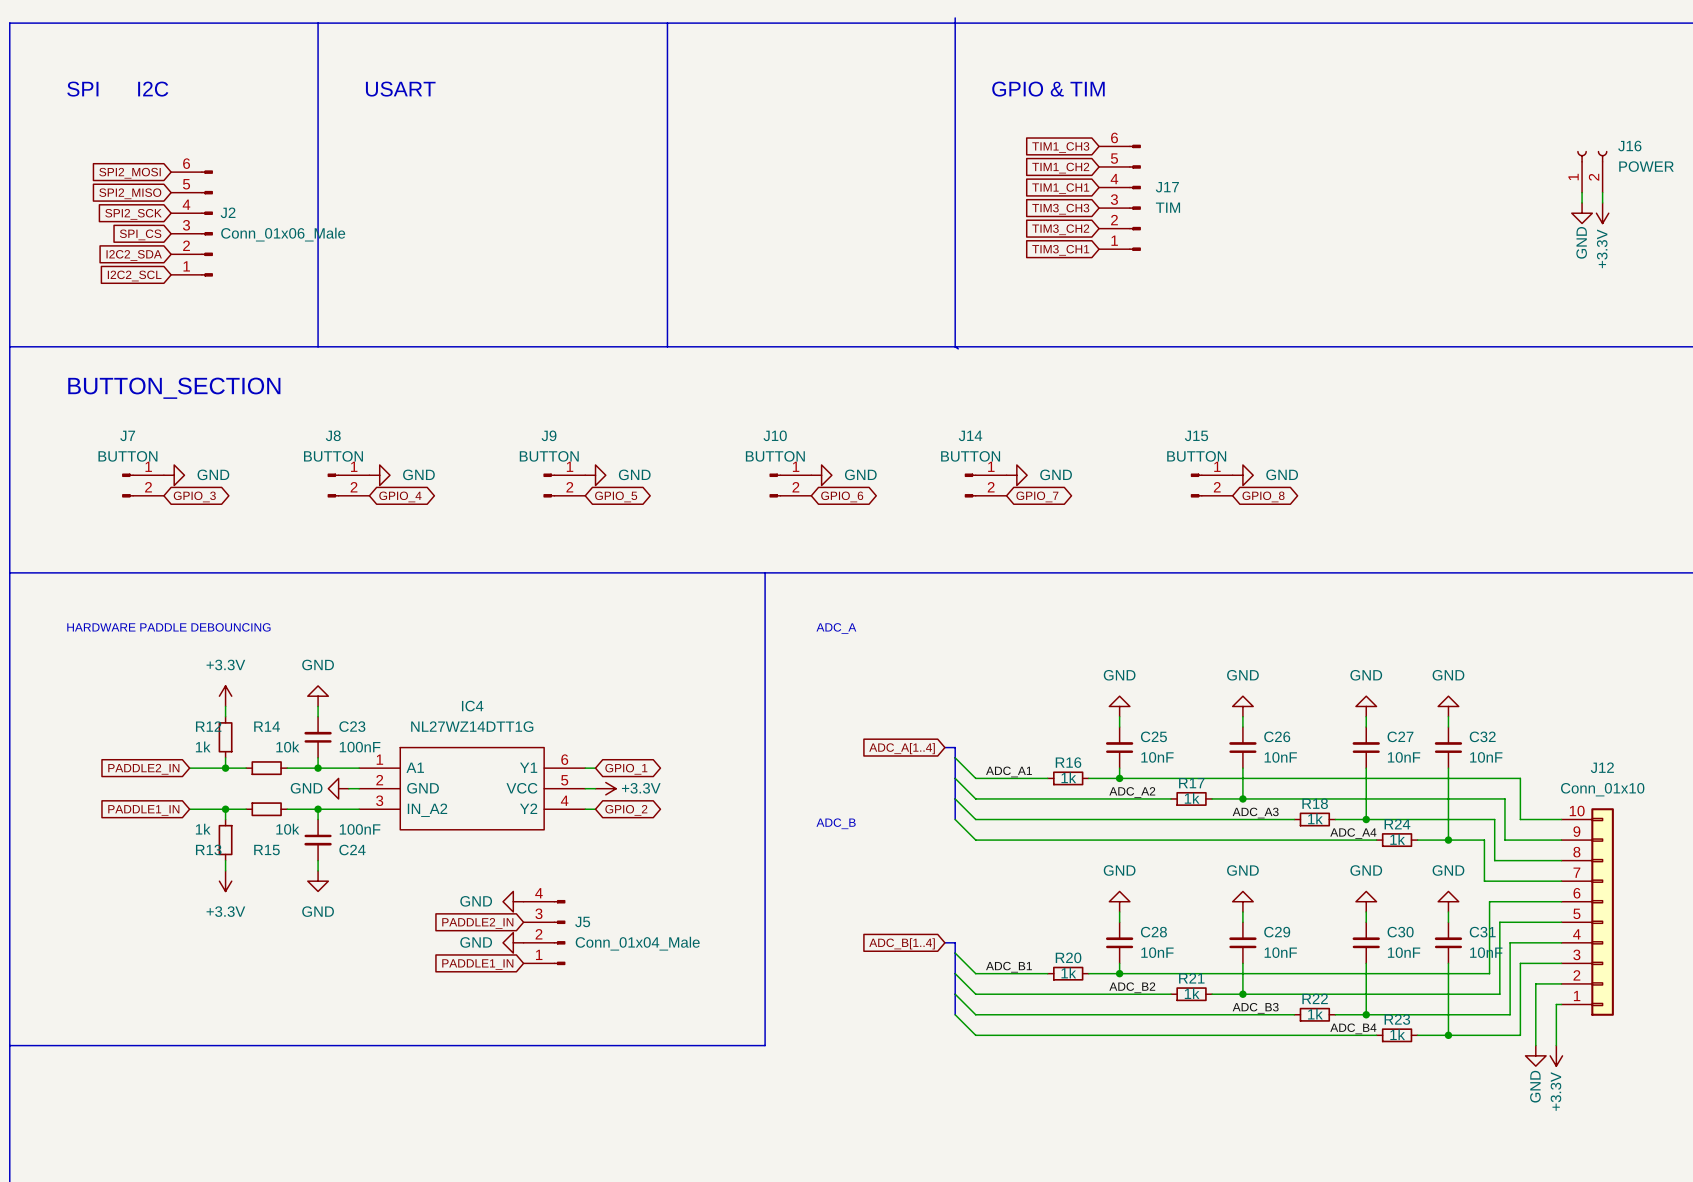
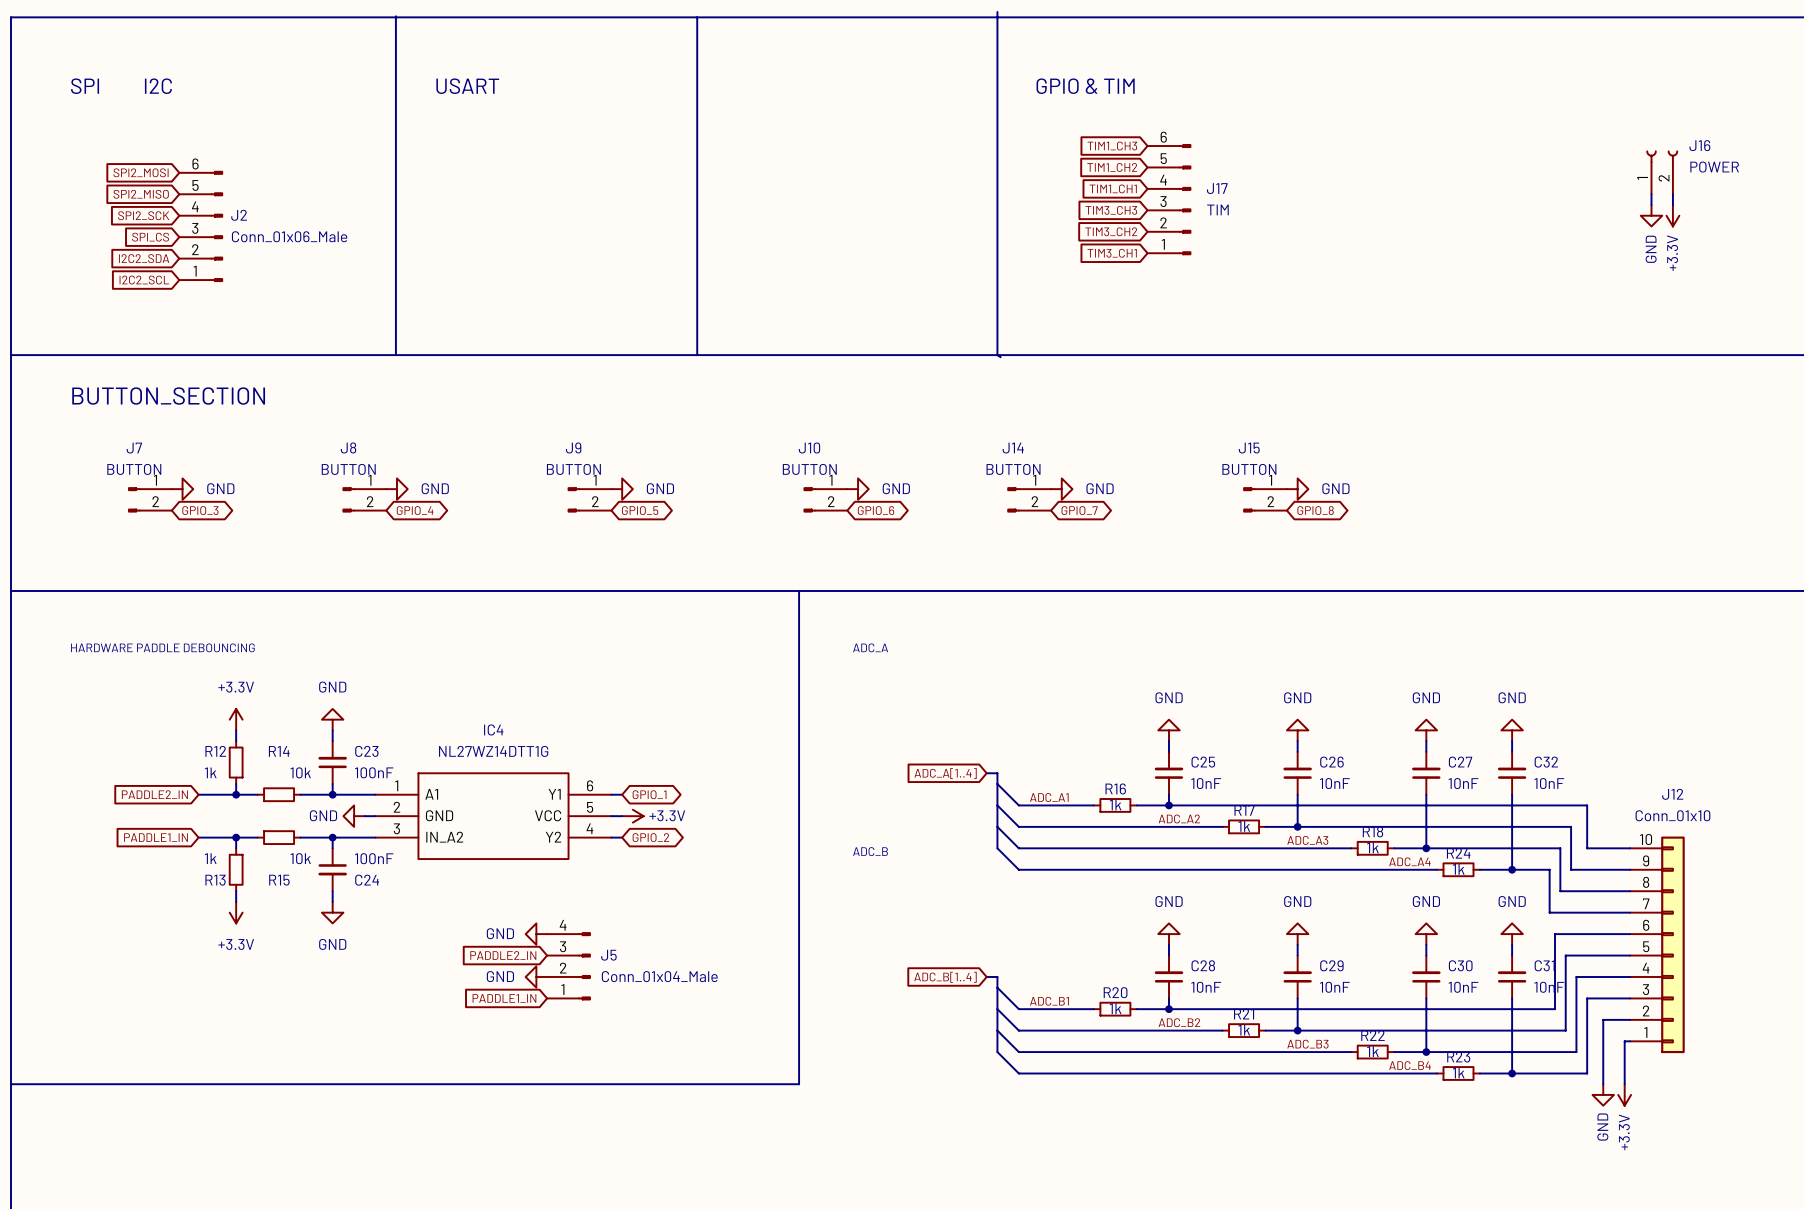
line: (318, 23) (318, 346) -> (395, 16) (395, 354)
text position: USART (400, 89) -> USART (467, 86)

